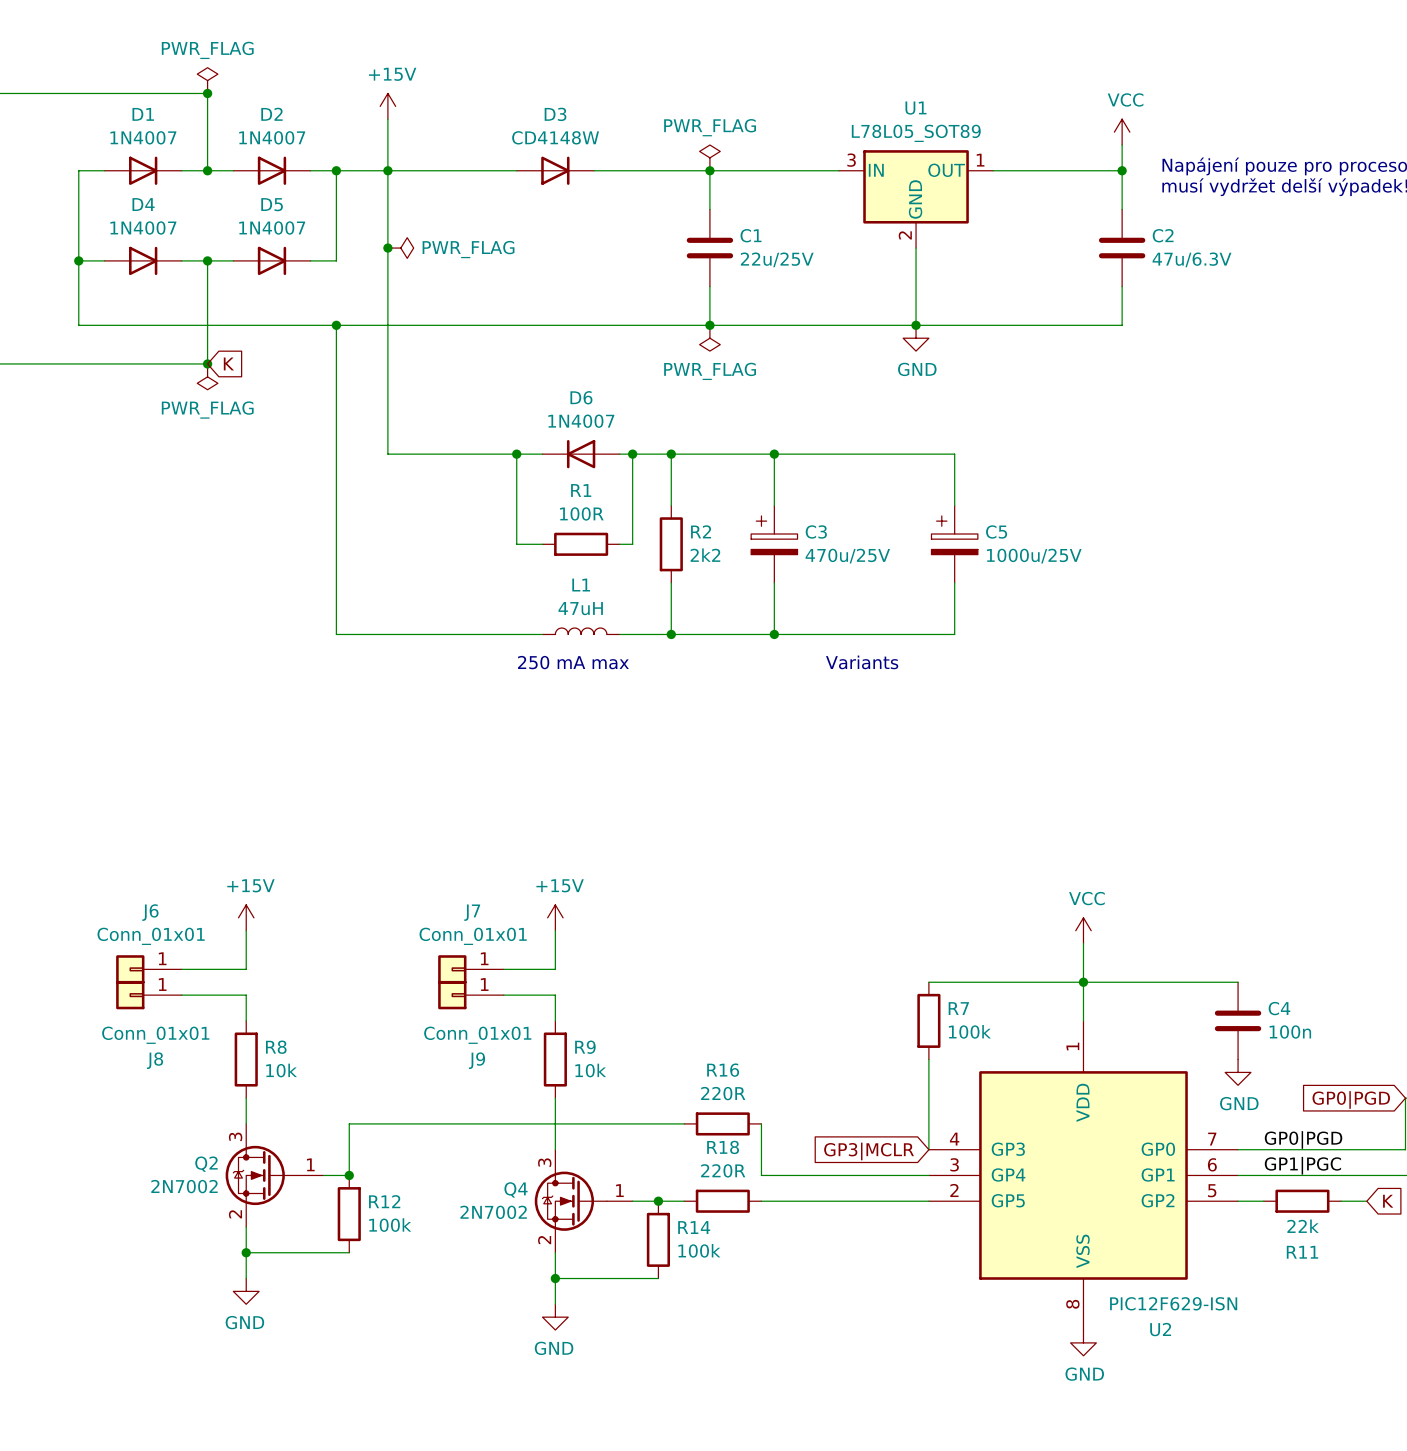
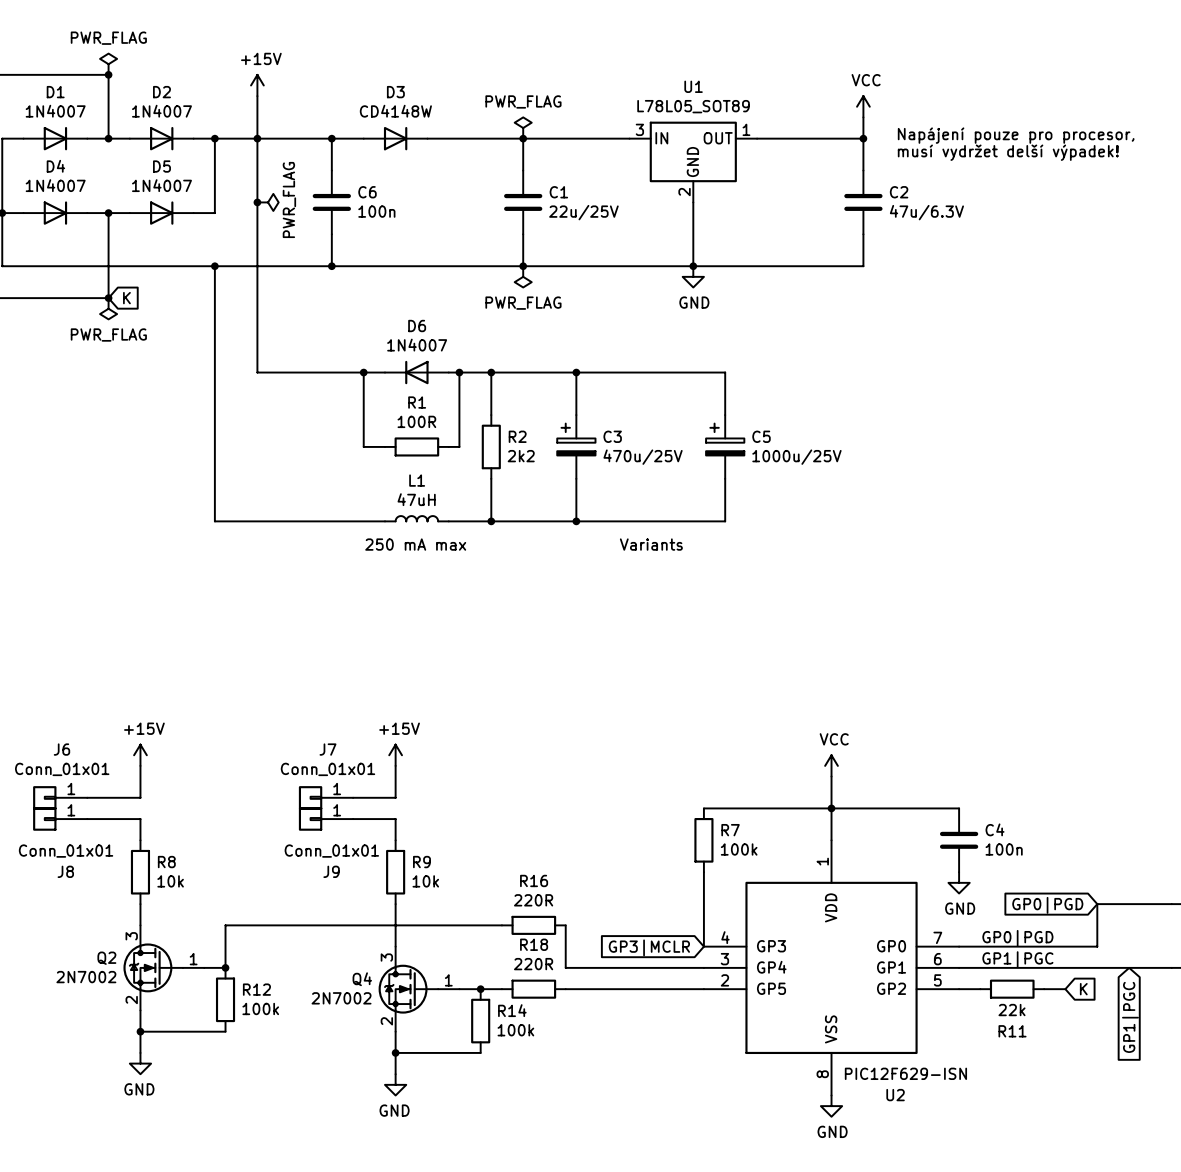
wire: none -> (331, 138) (331, 170)
junction: none -> (331, 138)
C6: none -> 100n (331, 202)
power symbol text rotation: 0° (468, 249) -> 90° counterclockwise (289, 199)
wire: none -> (331, 234) (331, 266)
junction: none -> (331, 266)

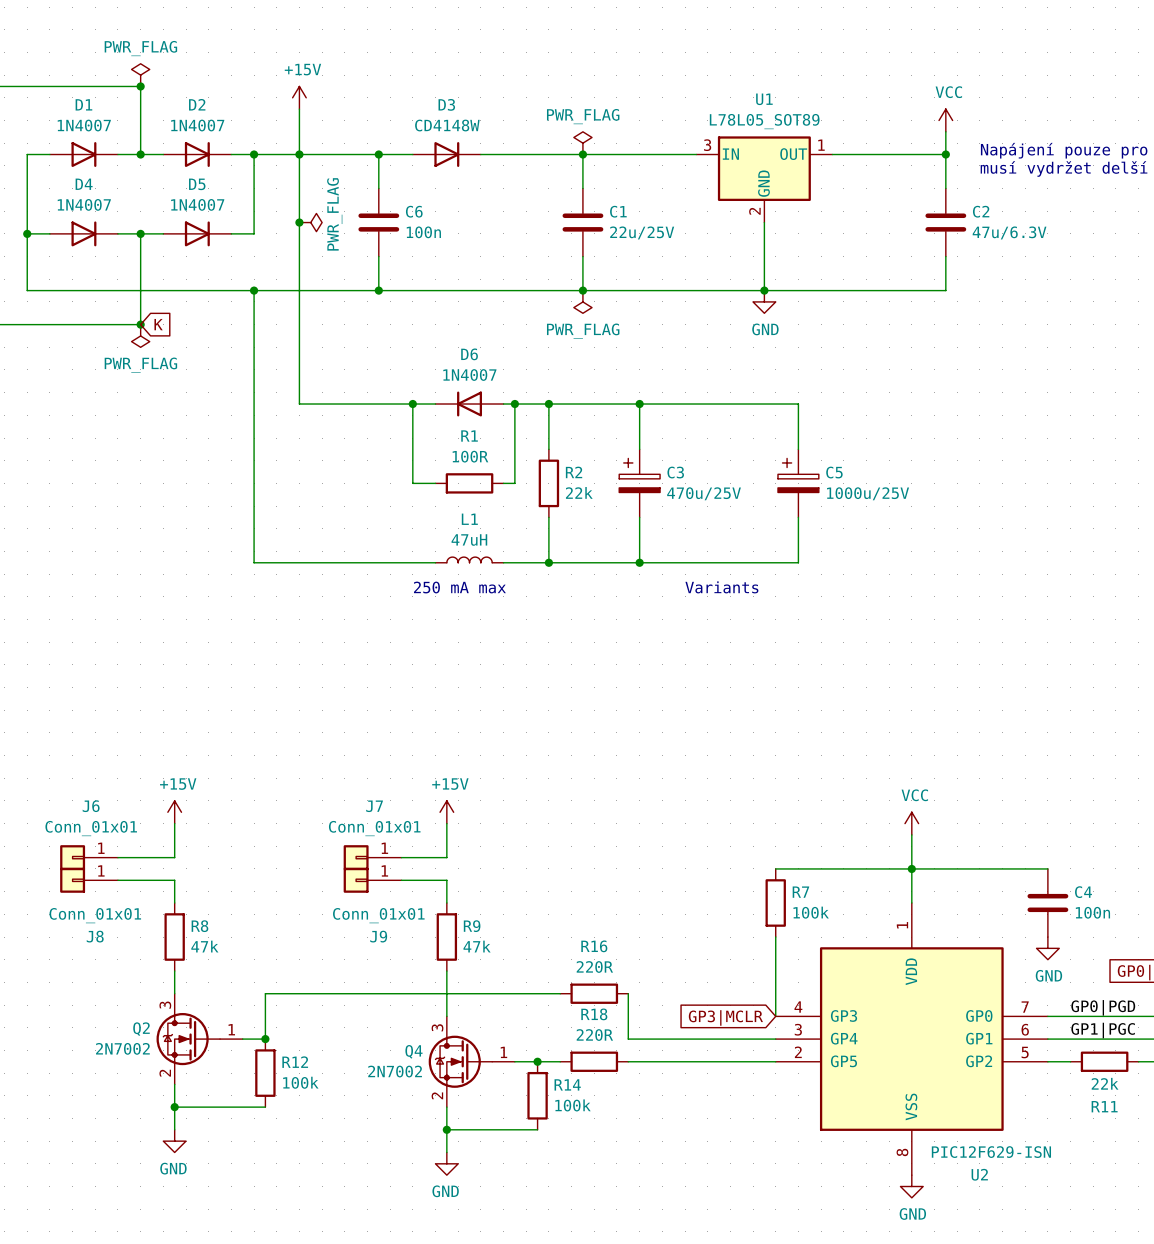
R2 value: 2k2 (521, 456) -> 22k (579, 492)
R8 value: 10k (170, 881) -> 47k (204, 946)
R9 value: 10k (425, 881) -> 47k (477, 946)

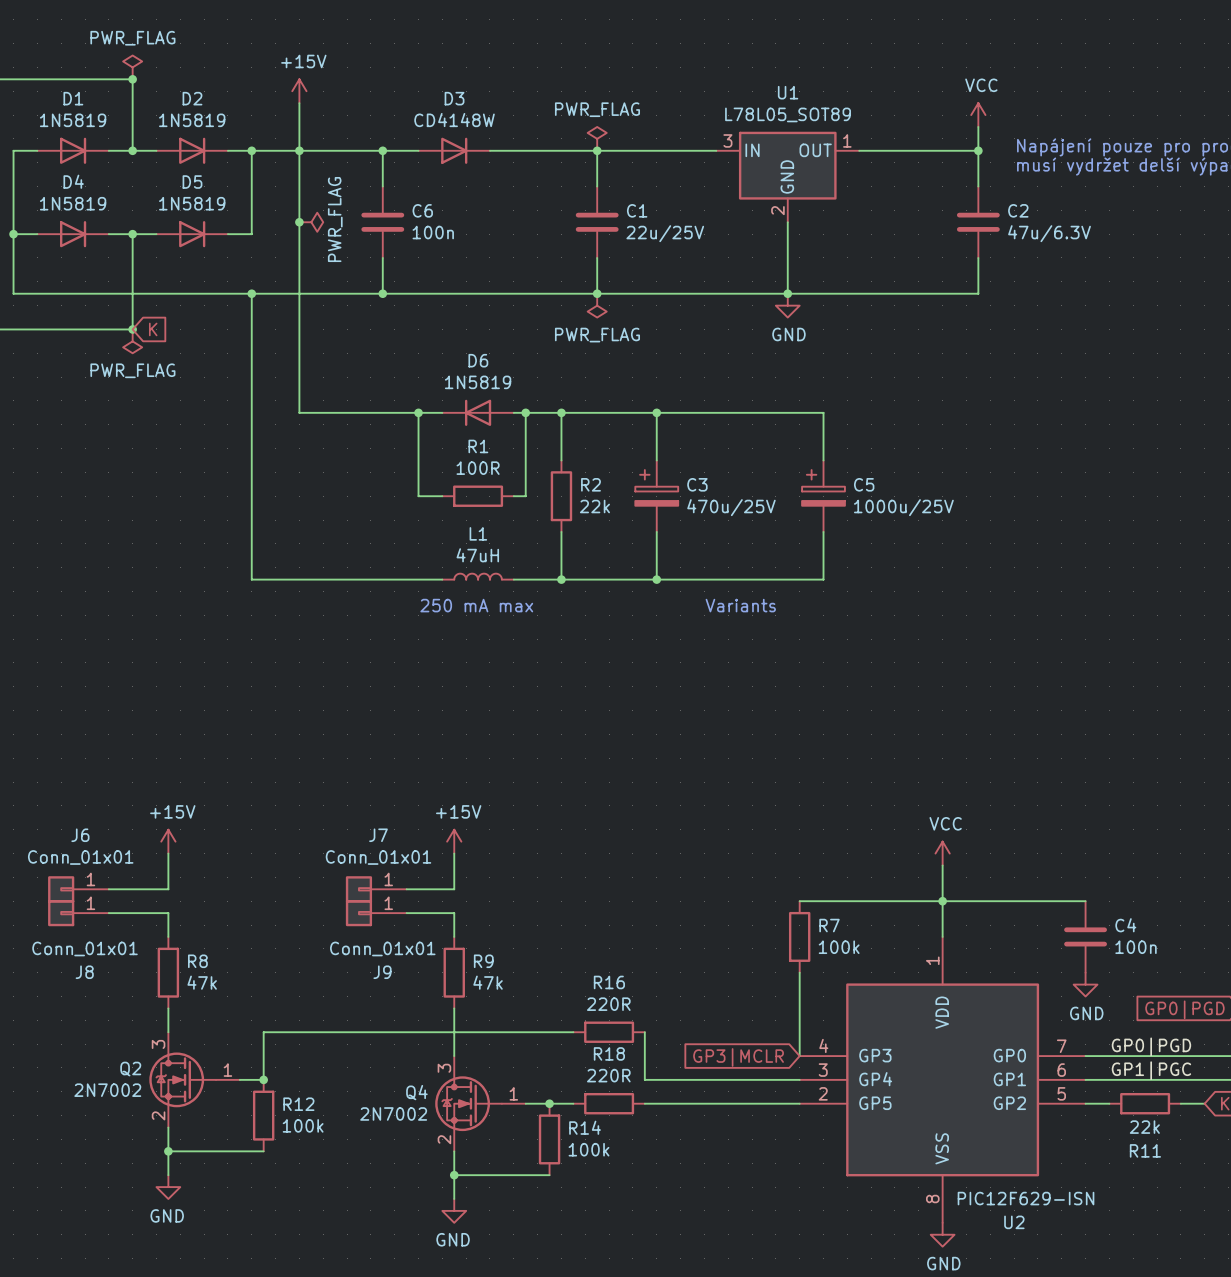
D1 value: 1N4007 (84, 125) -> 1N5819 (73, 120)
D2 value: 1N4007 (197, 125) -> 1N5819 (192, 120)
D4 value: 1N4007 (84, 204) -> 1N5819 (73, 203)
D5 value: 1N4007 (197, 204) -> 1N5819 (192, 203)
D6 value: 1N4007 (469, 375) -> 1N5819 (478, 382)

